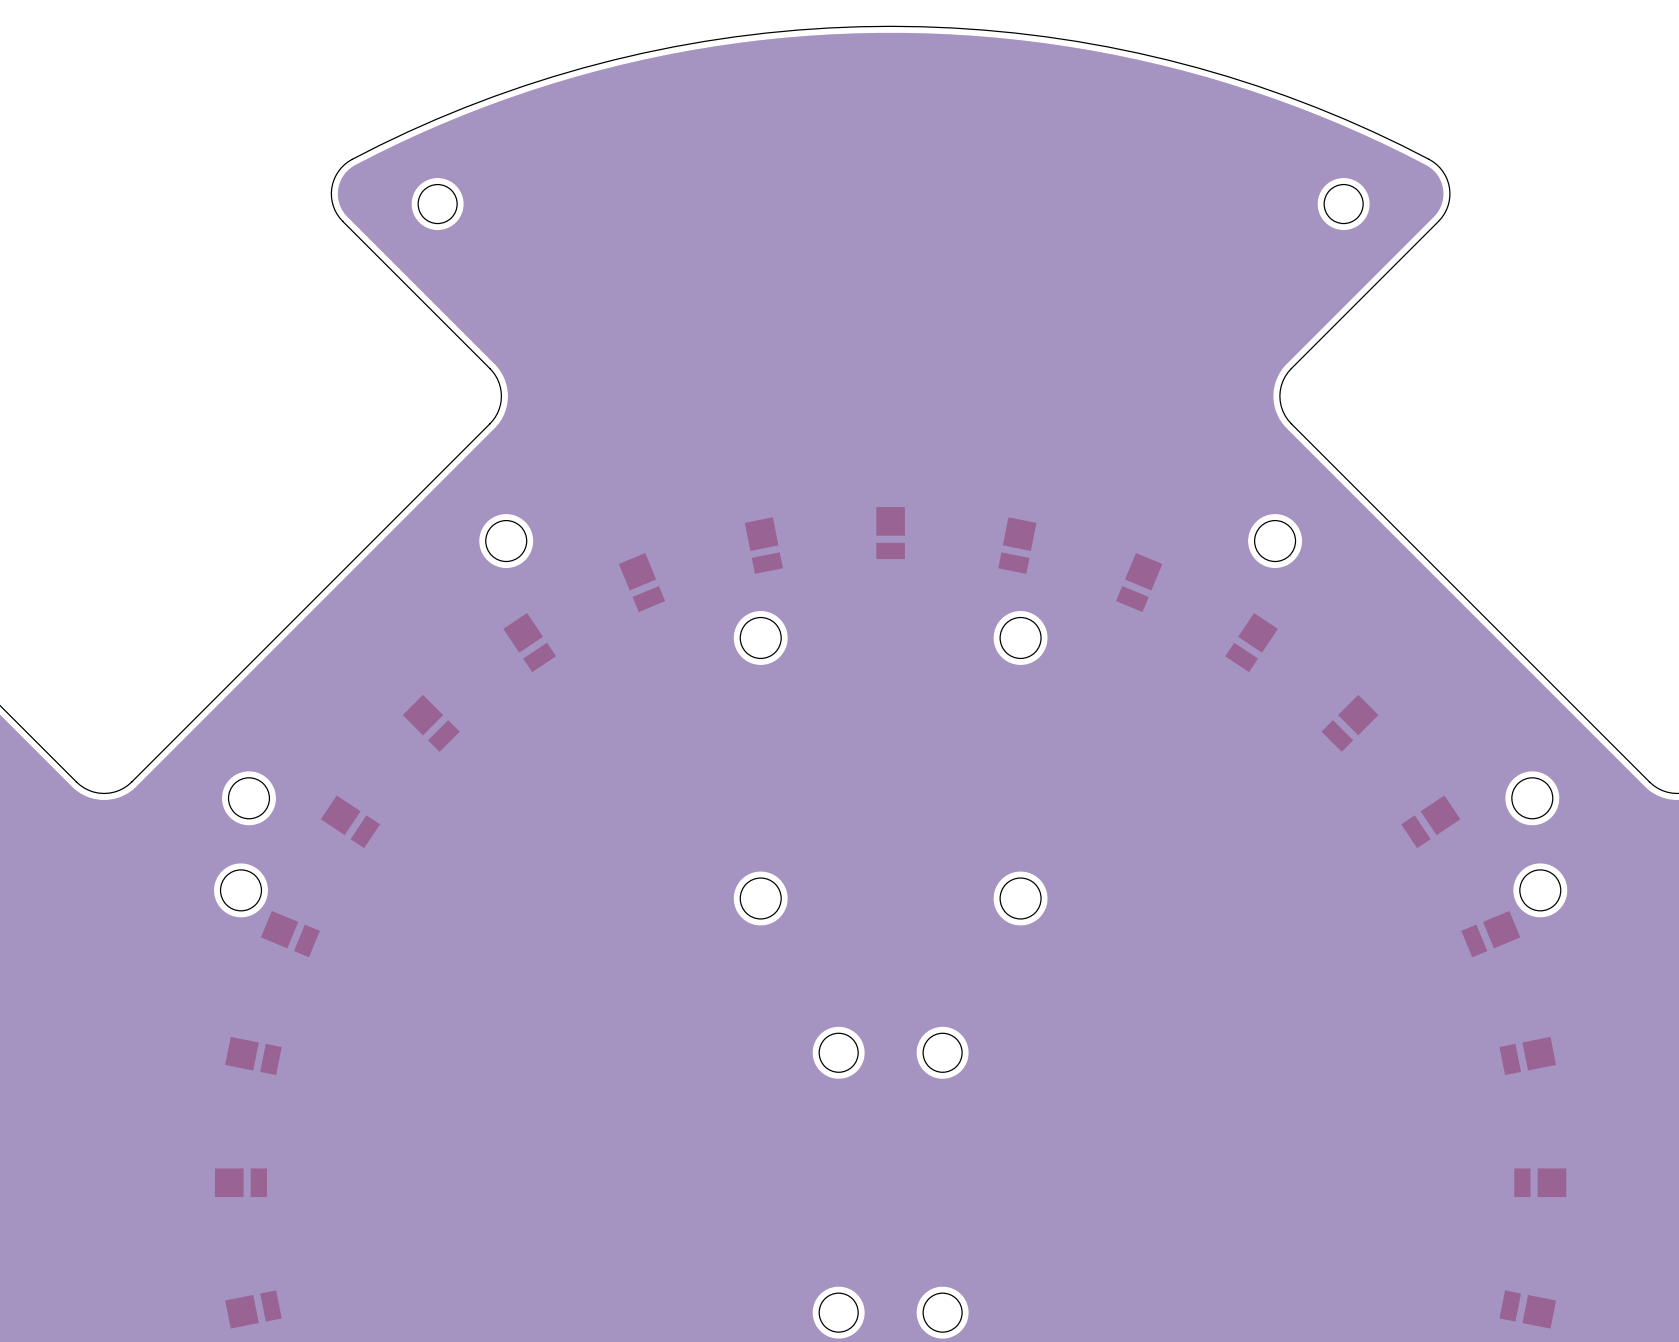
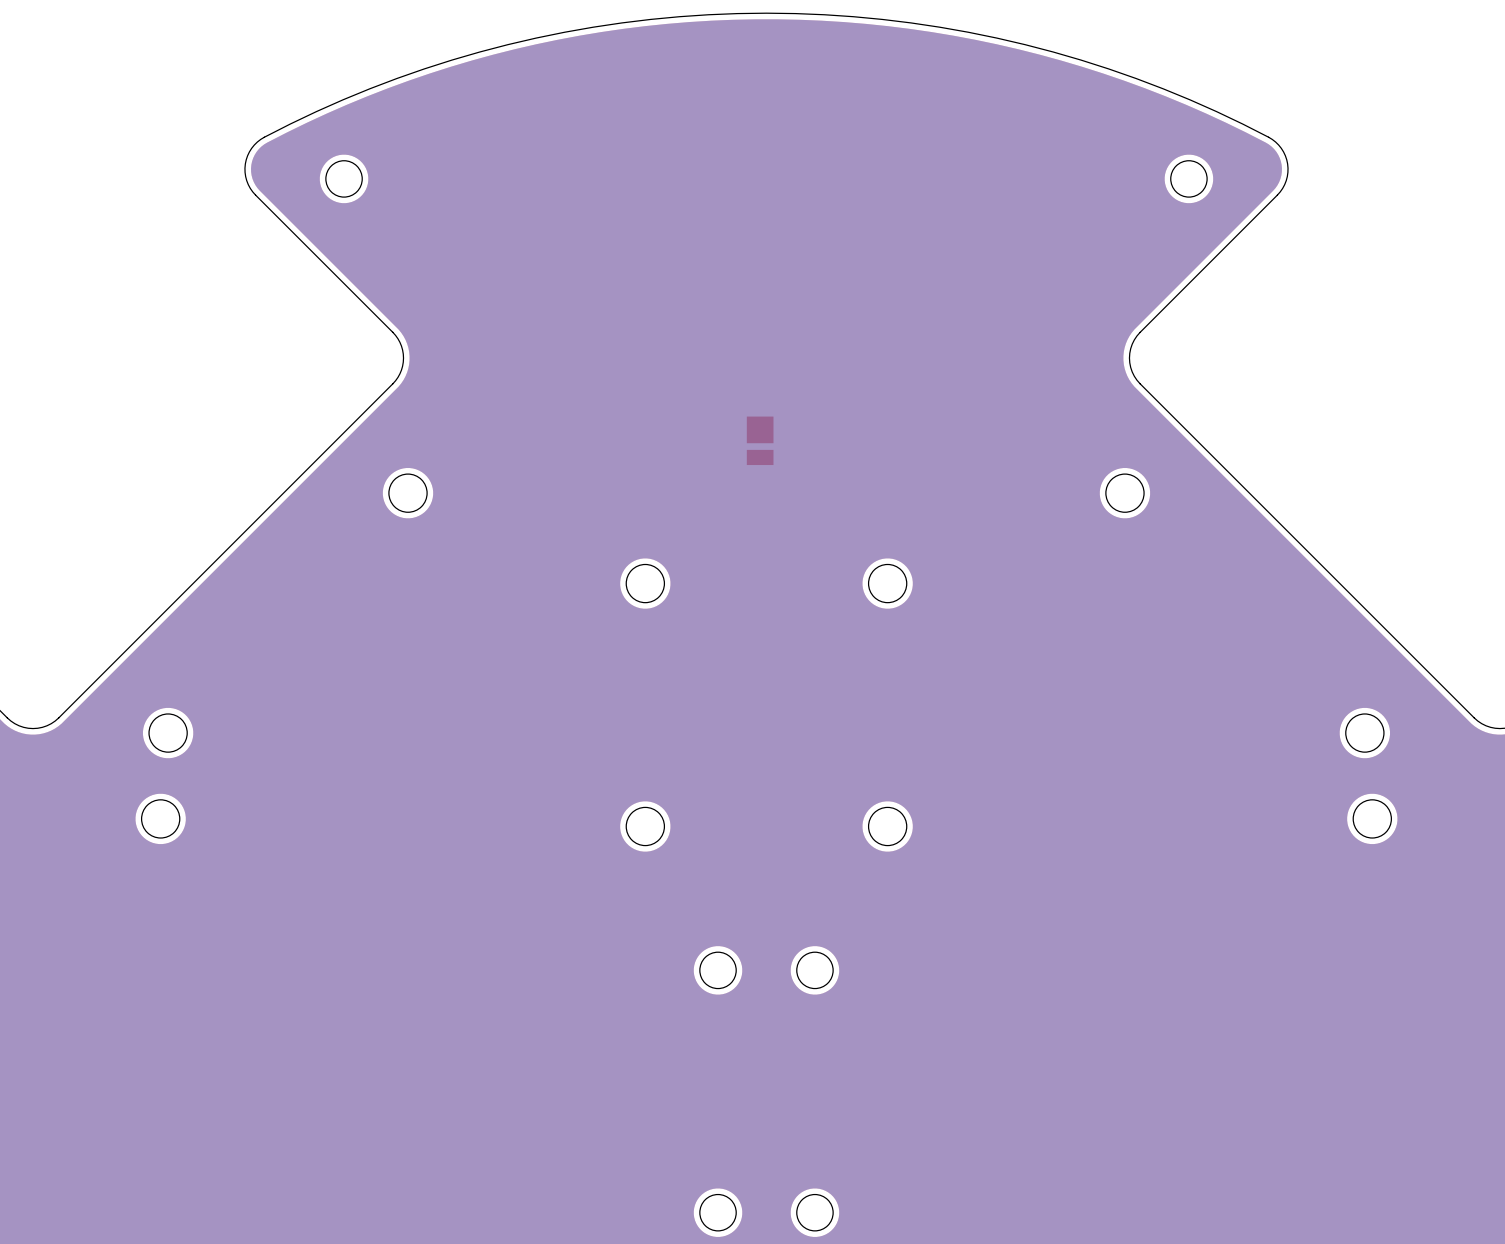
part position: (890, 533) -> (760, 440)
part: (763, 545) -> none
part: (1017, 545) -> none
part: (642, 582) -> none
part: (1139, 582) -> none
part: (529, 642) -> none
part: (1251, 642) -> none
part: (431, 723) -> none
part: (1349, 723) -> none
part: (350, 821) -> none
part: (1430, 821) -> none
part: (290, 934) -> none
part: (1490, 934) -> none
part: (253, 1056) -> none
part: (1527, 1056) -> none
part: (240, 1182) -> none
part: (1540, 1182) -> none
part: (253, 1309) -> none
part: (1527, 1309) -> none

